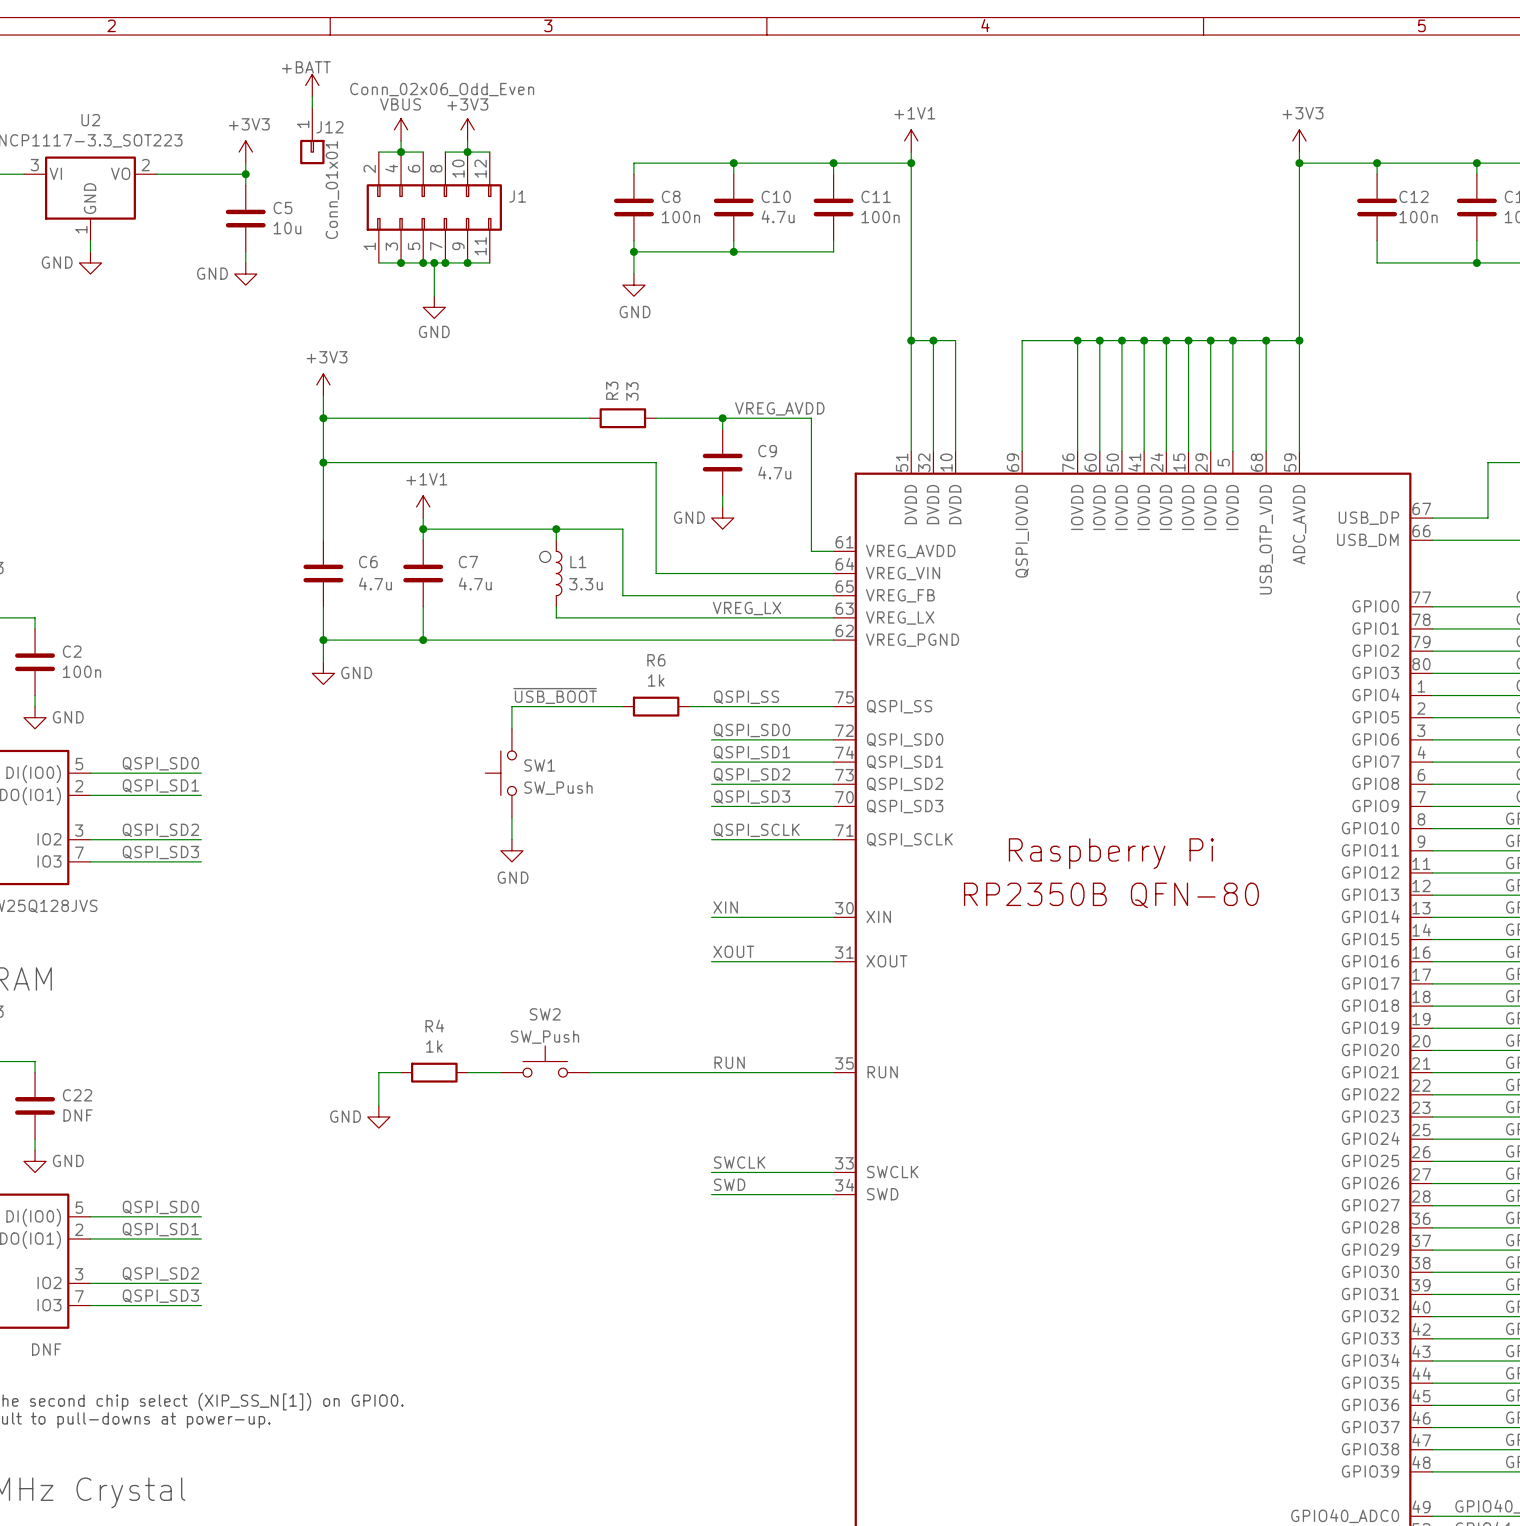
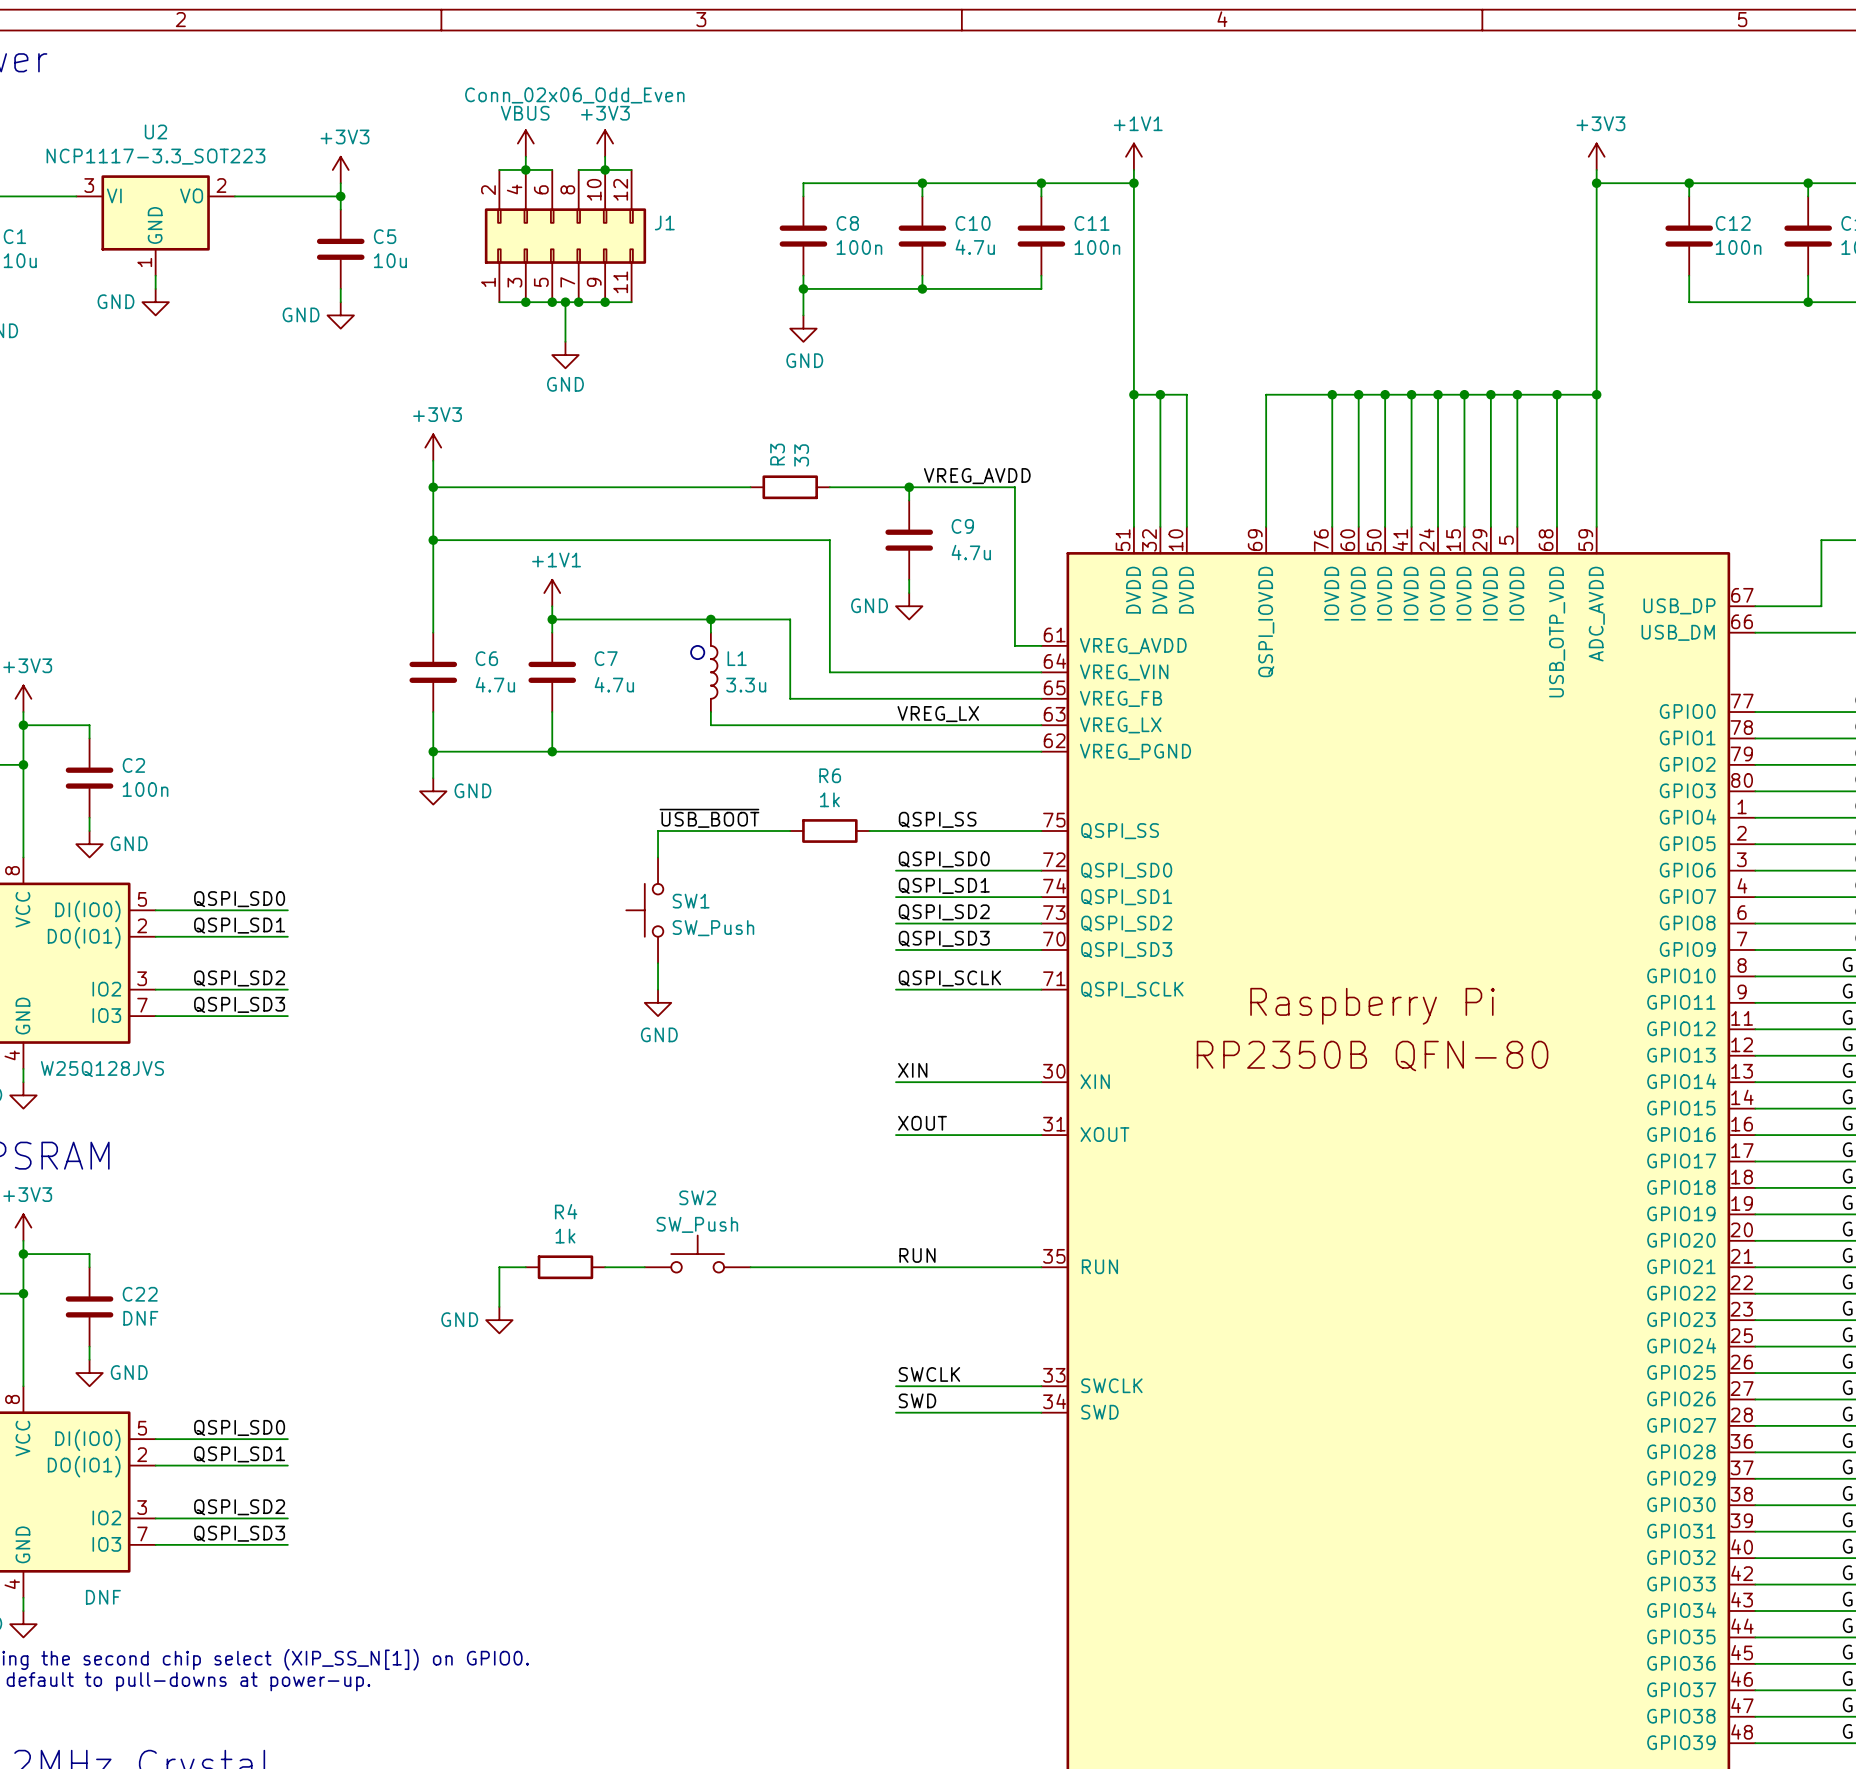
power symbol: +BATT (312, 85) -> none
wire: (312, 96) (312, 107) -> none
J12: Conn_01x01 (312, 135) -> none

